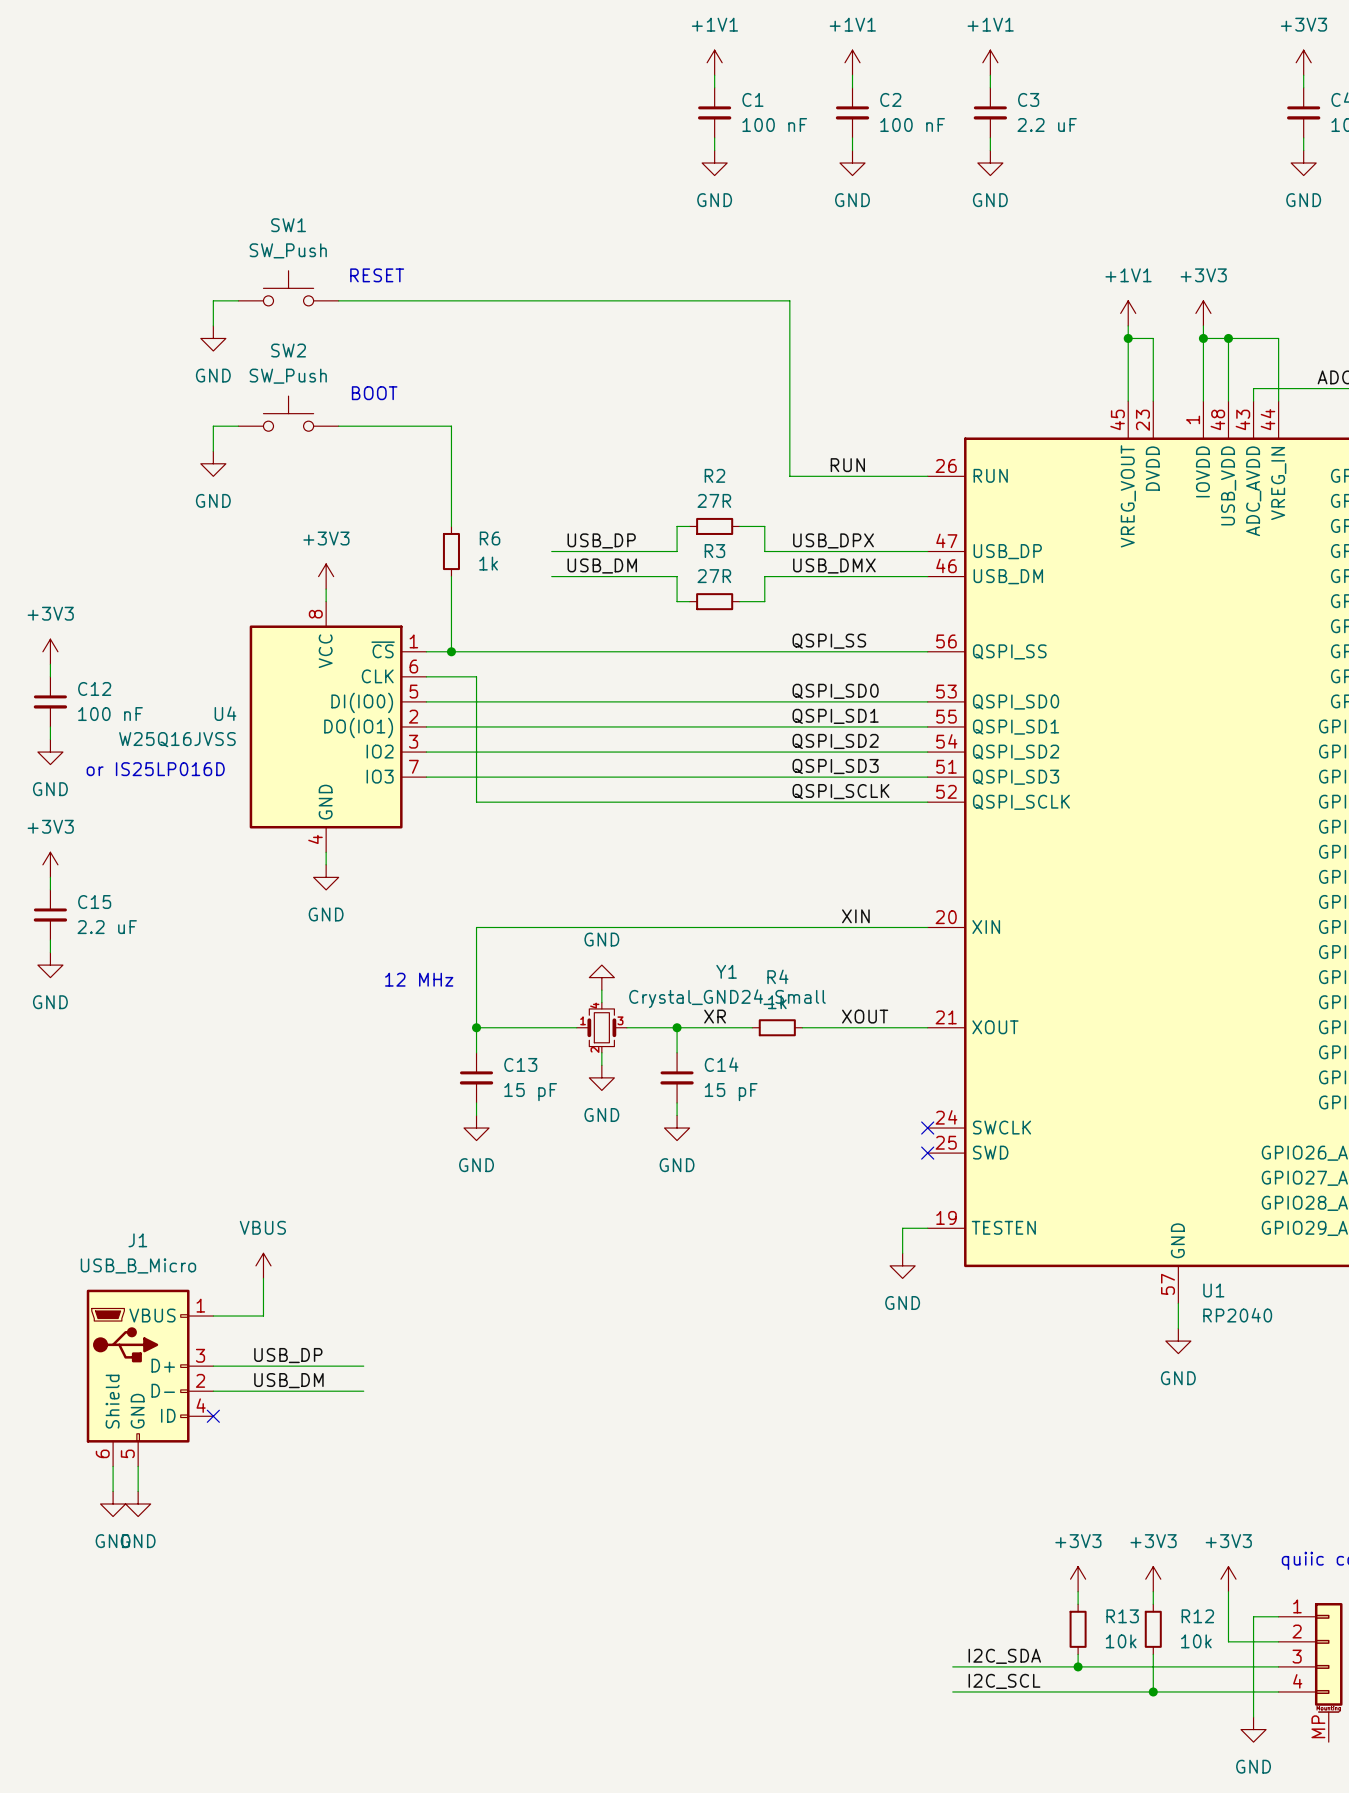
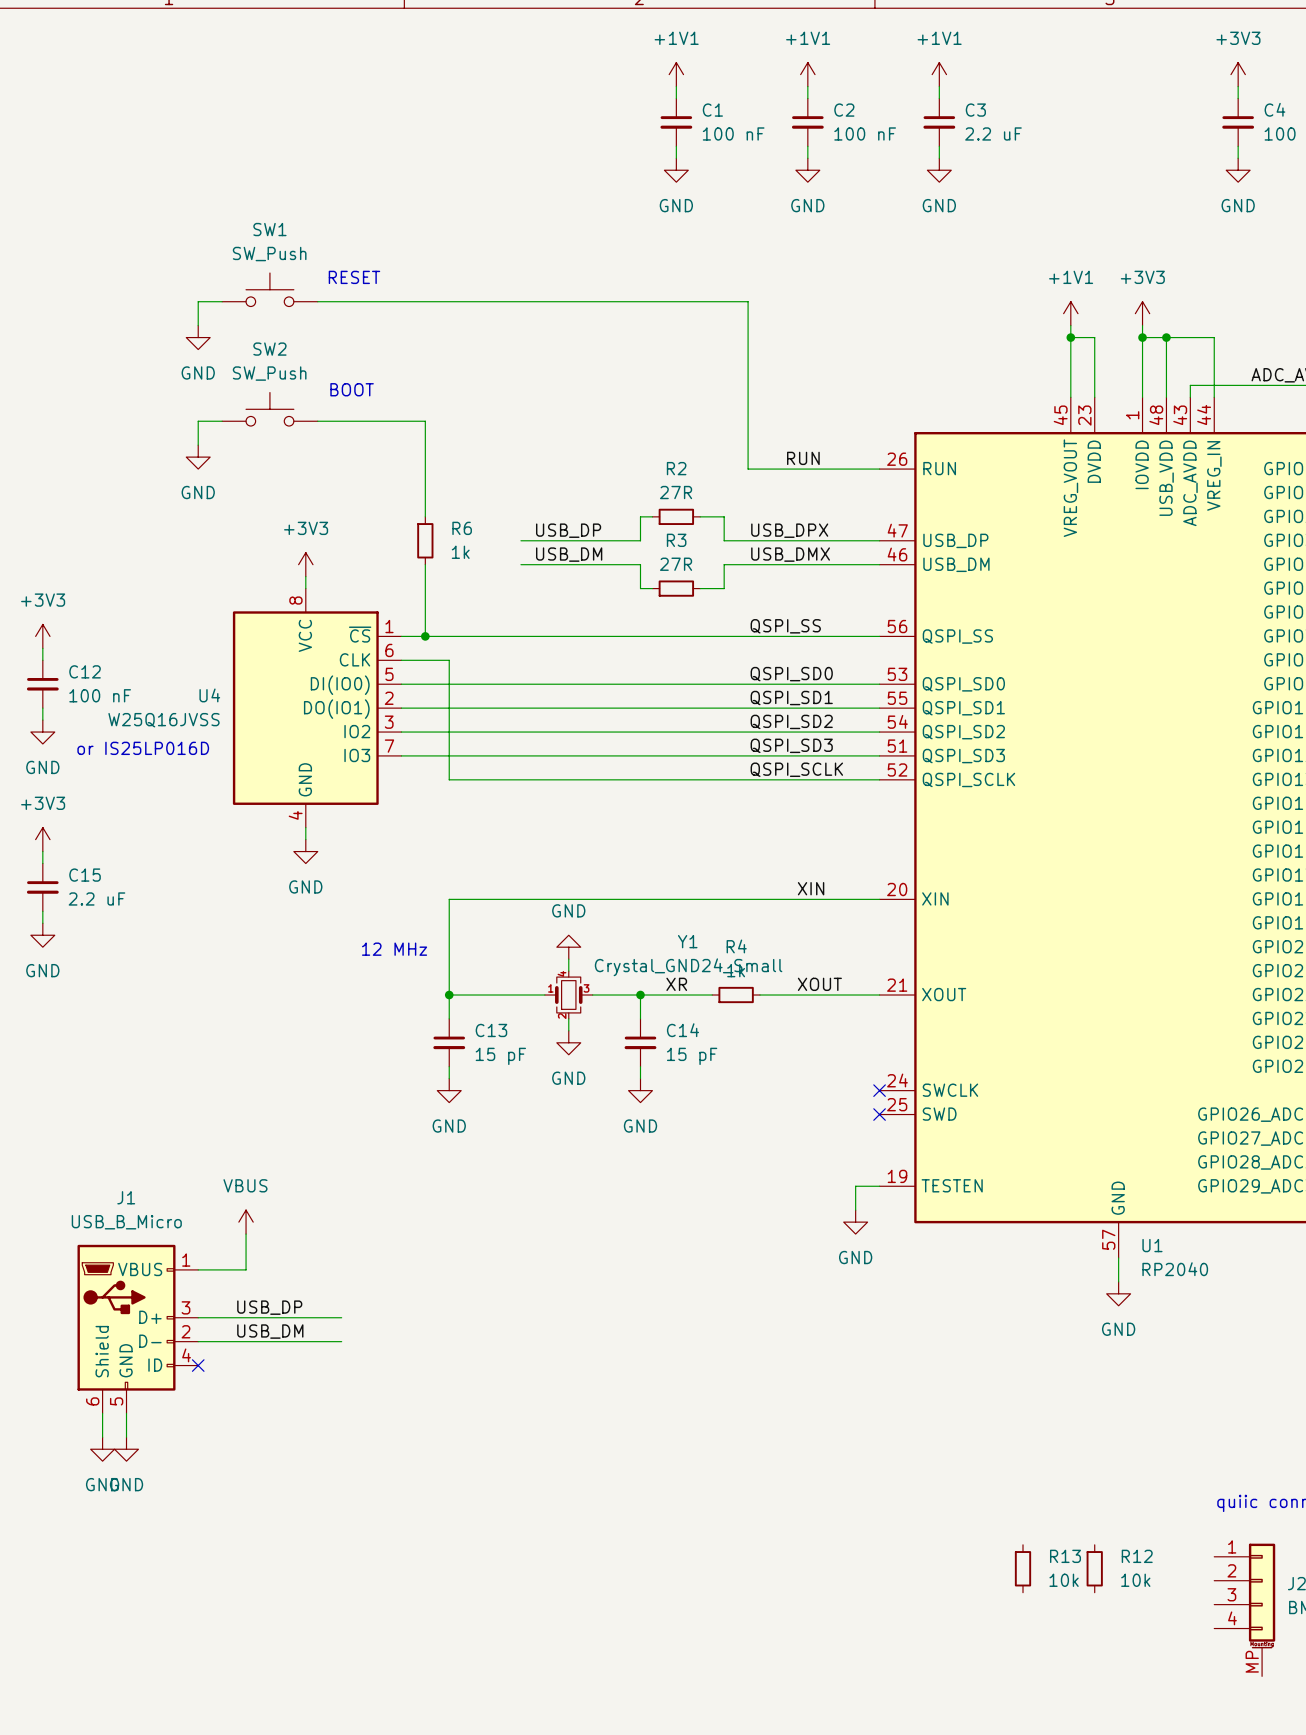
power symbol: +3V3 (1078, 1579) -> none
power symbol: +3V3 (1153, 1579) -> none
power symbol: +3V3 (1228, 1579) -> none
wire: (1078, 1591) (1078, 1604) -> none
wire: (1153, 1591) (1153, 1604) -> none
wire: (1228, 1591) (1228, 1641) (1278, 1641) -> none
wire: (1278, 1616) (1253, 1616) (1253, 1717) -> none
wire: (1078, 1654) (1078, 1666) -> none
wire: (1153, 1654) (1153, 1691) -> none
label: I2C_SDA (1004, 1656) -> none
wire: (952, 1666) (1278, 1666) -> none
junction: (1078, 1666) -> none
label: I2C_SCL (1004, 1681) -> none
wire: (952, 1691) (1278, 1691) -> none
junction: (1153, 1691) -> none
power symbol: GND (1253, 1729) -> none

